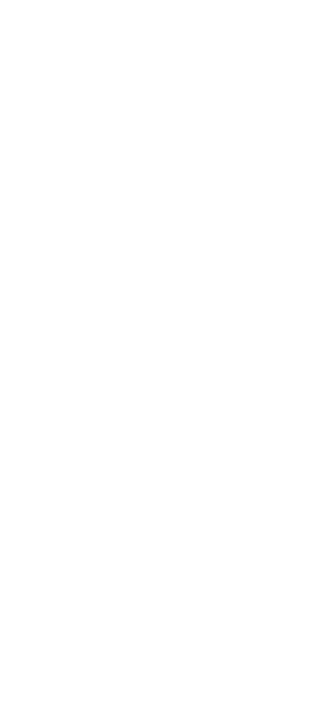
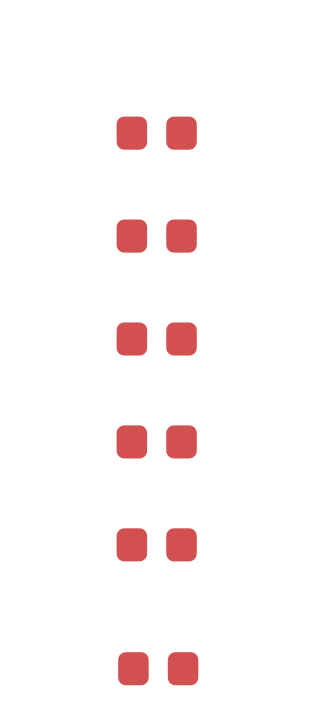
part: none -> (156, 133)
part: none -> (156, 236)
part: none -> (156, 339)
part: none -> (156, 441)
part: none -> (156, 544)
part: none -> (158, 668)

